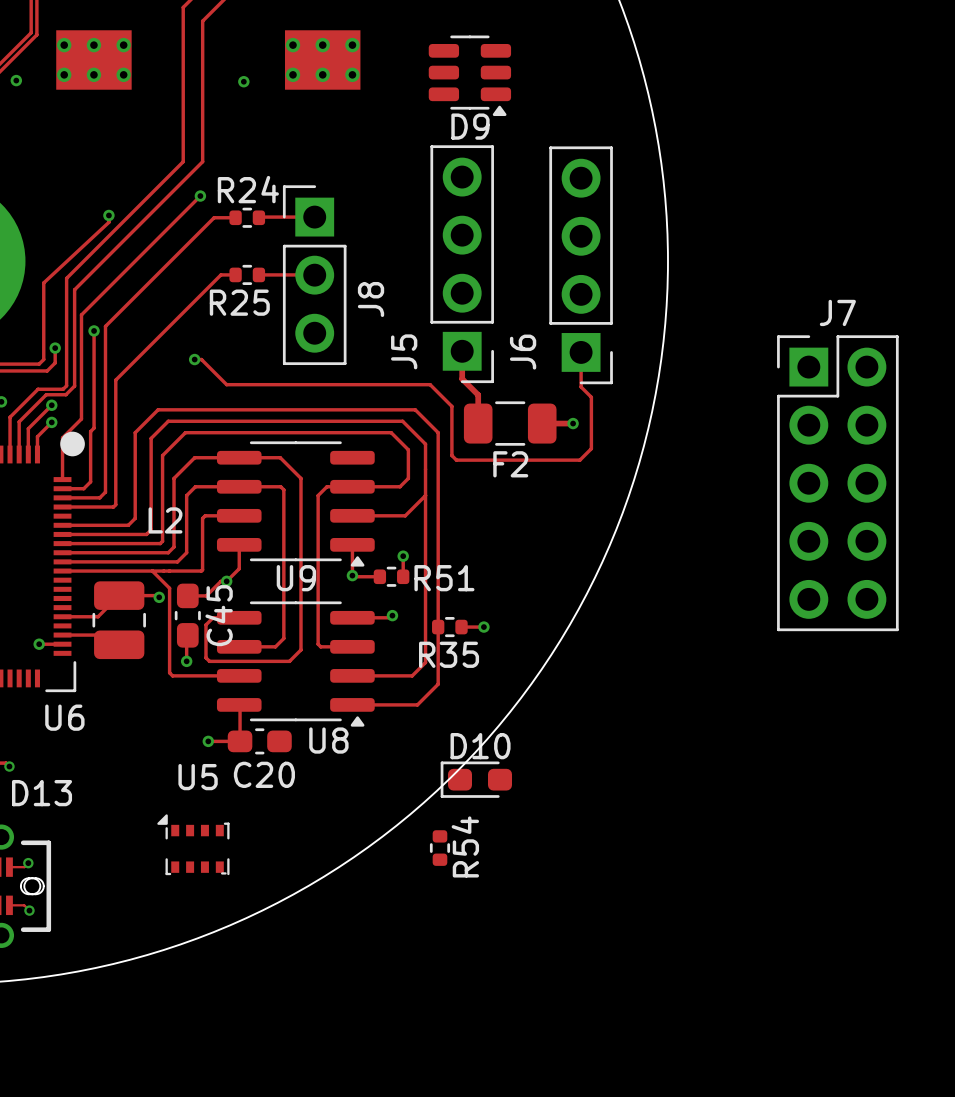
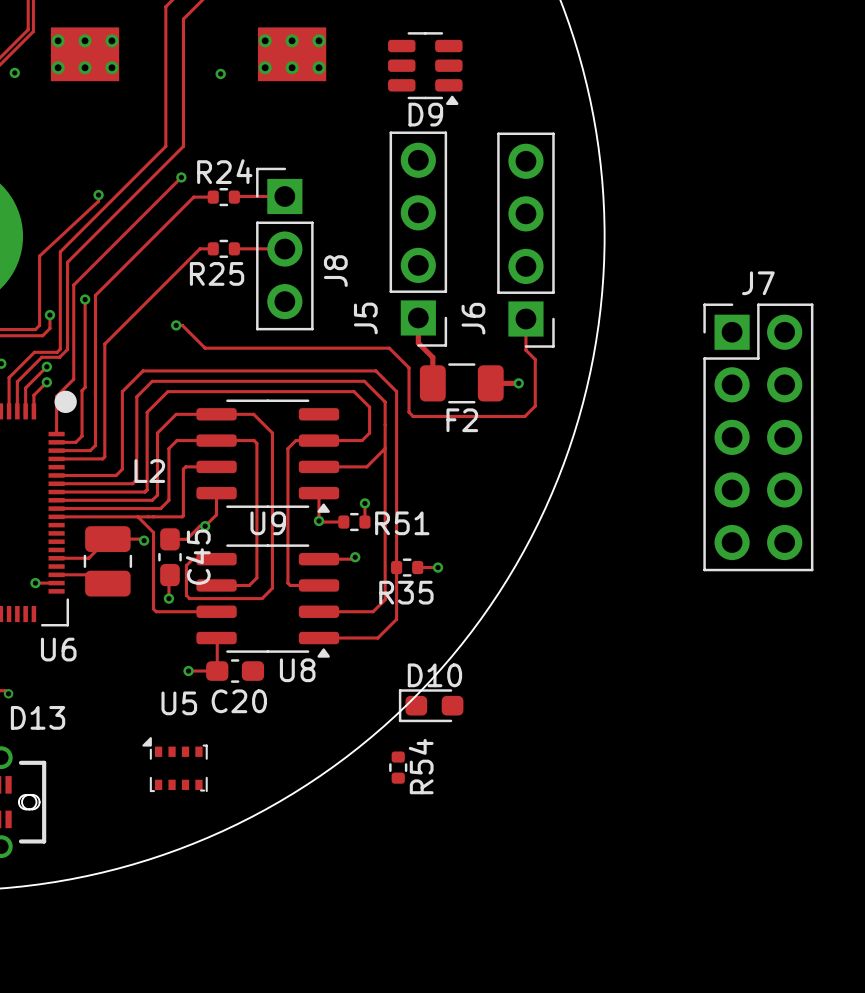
track: (28, 863) (24, 867) (9, 867) -> none
via: (28, 863) -> none
track: (9, 905) (24, 905) (29, 910) -> none
via: (29, 910) -> none

